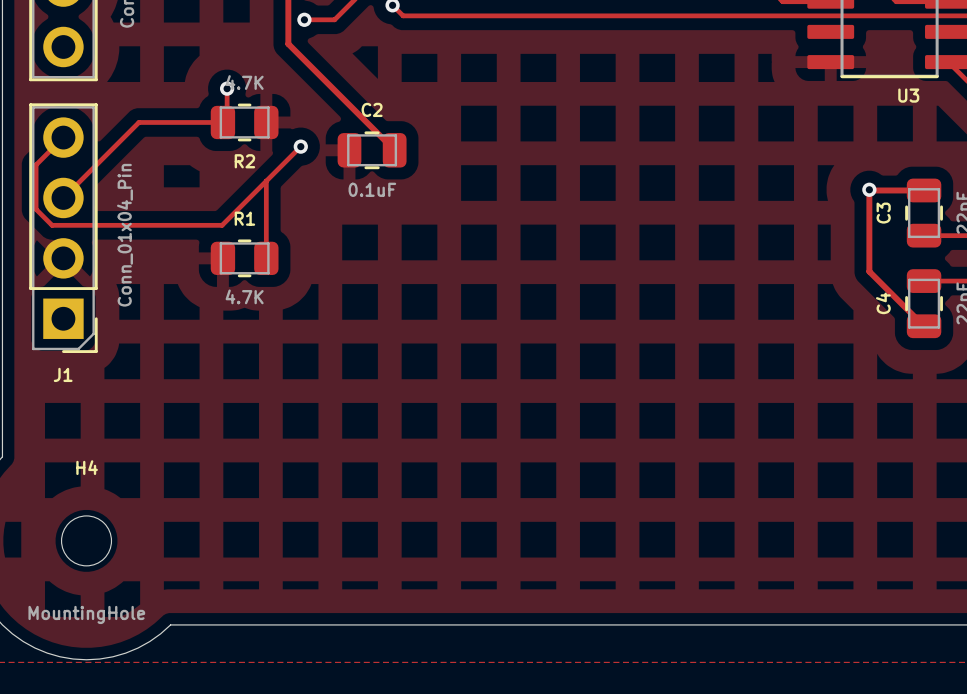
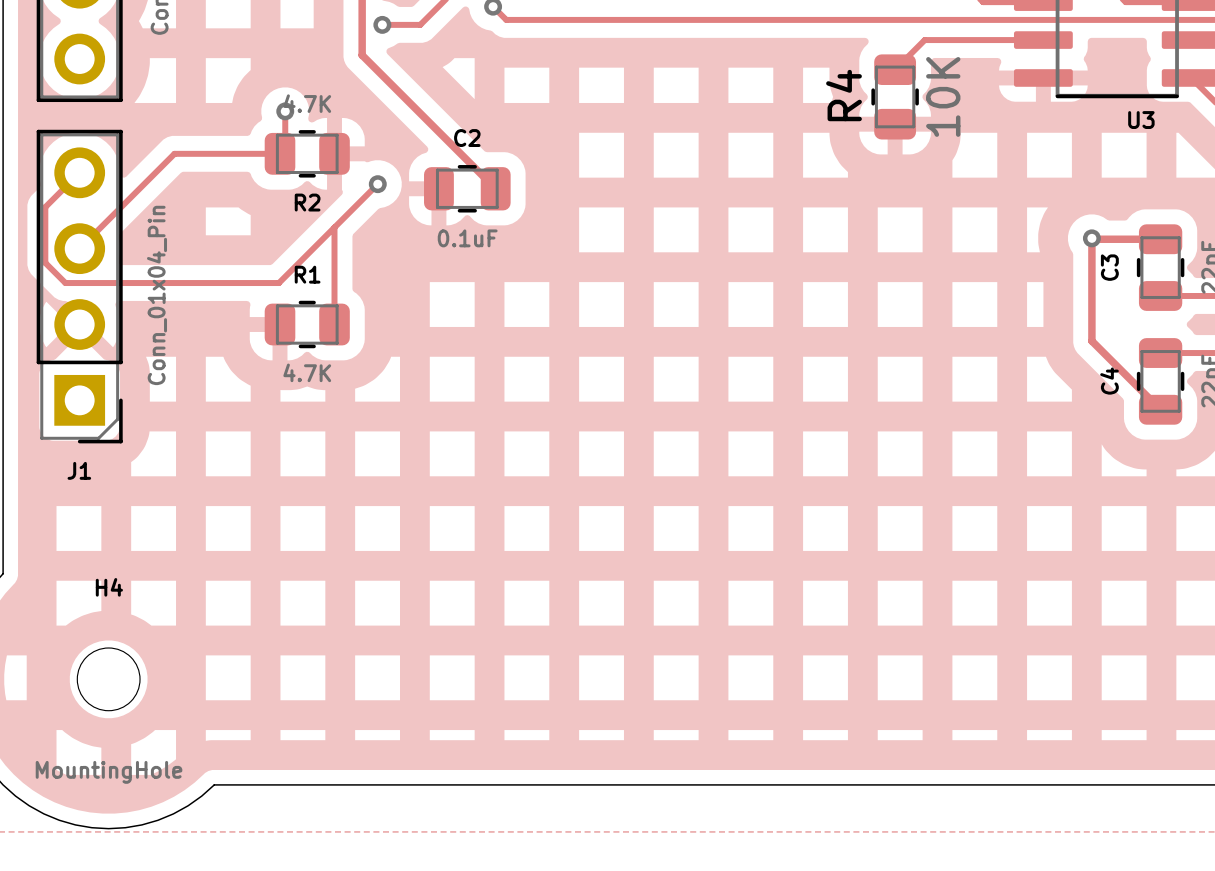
track: none -> (1043, 40) (924, 40) (895, 69)
R4: none -> 10K (895, 96)

